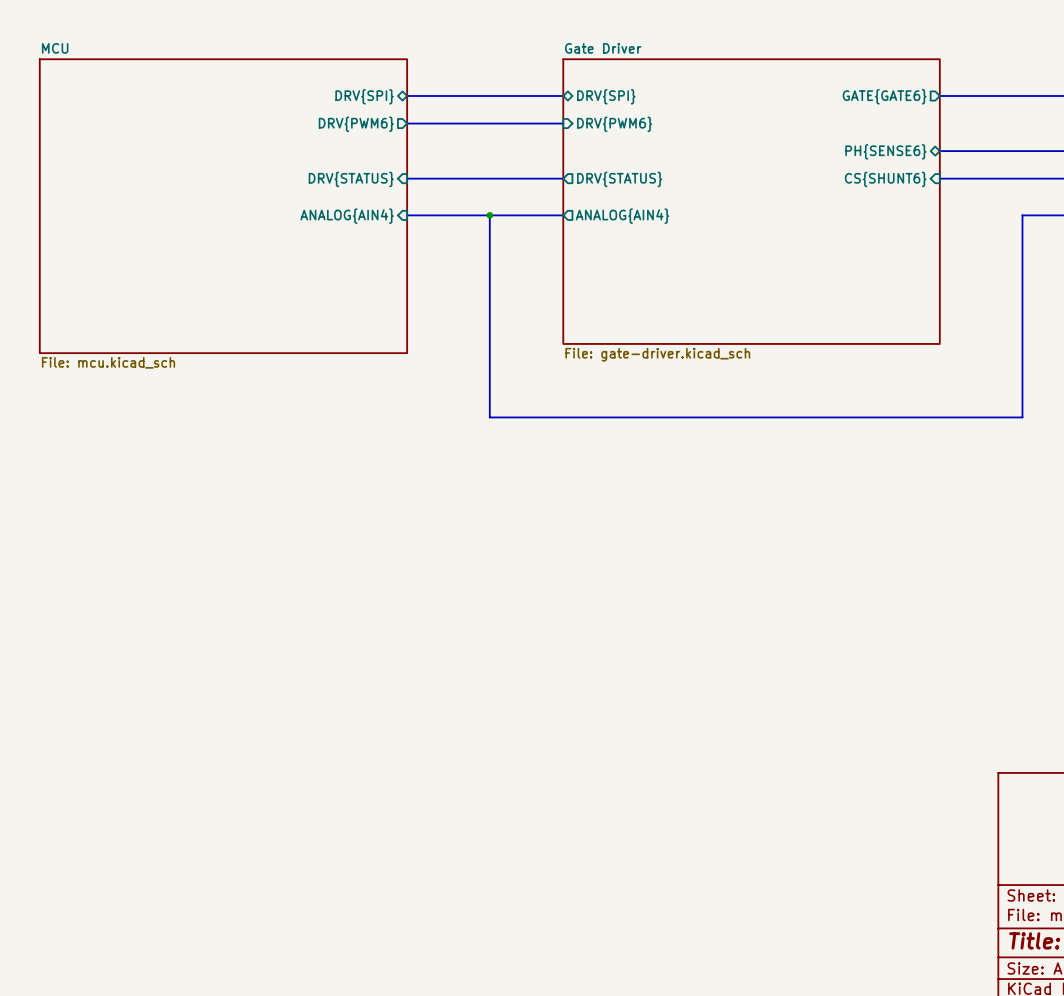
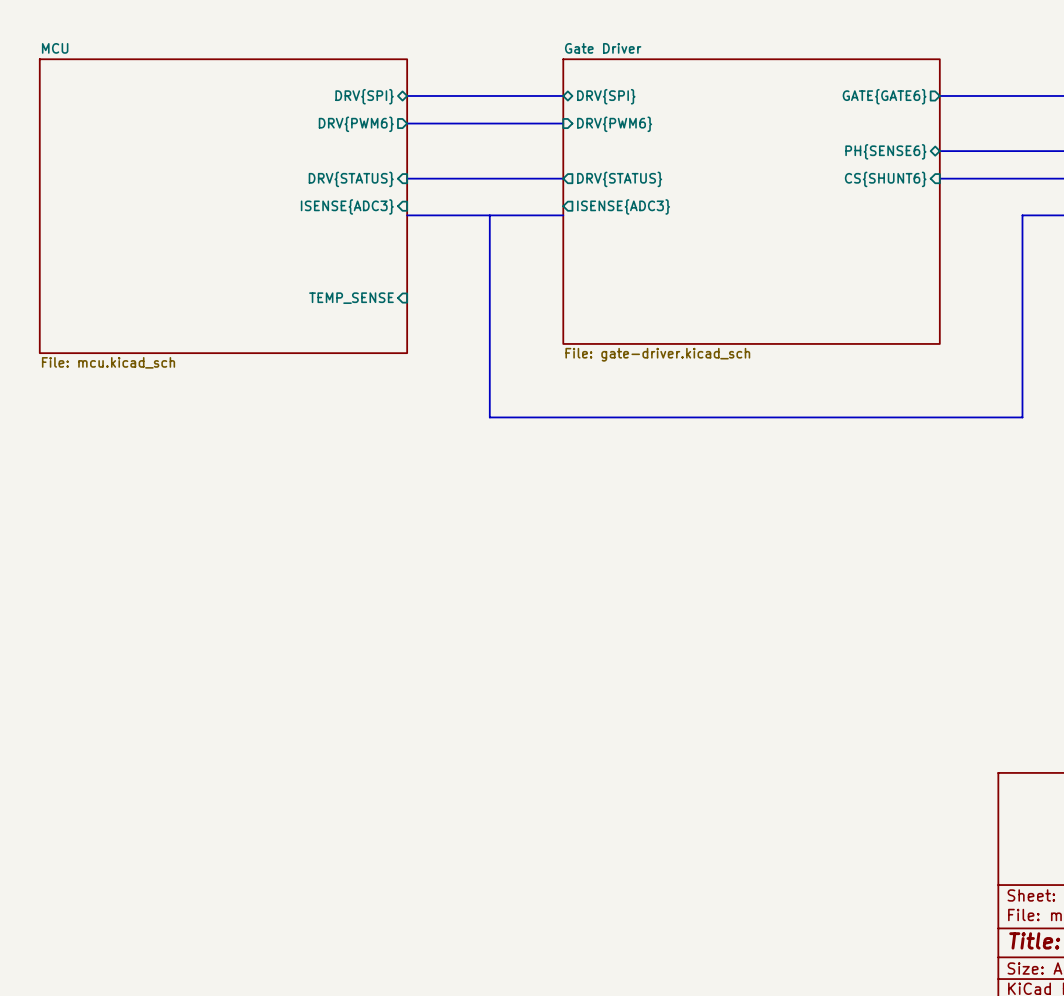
sheet pin: none -> ISENSE{ADC3} (347, 206)
sheet pin: none -> ISENSE{ADC3} (623, 206)
junction: (489, 215) -> none
sheet pin: ANALOG{AIN4} (347, 216) -> none
sheet pin: ANALOG{AIN4} (622, 216) -> none
sheet pin: none -> TEMP_SENSE (351, 298)

